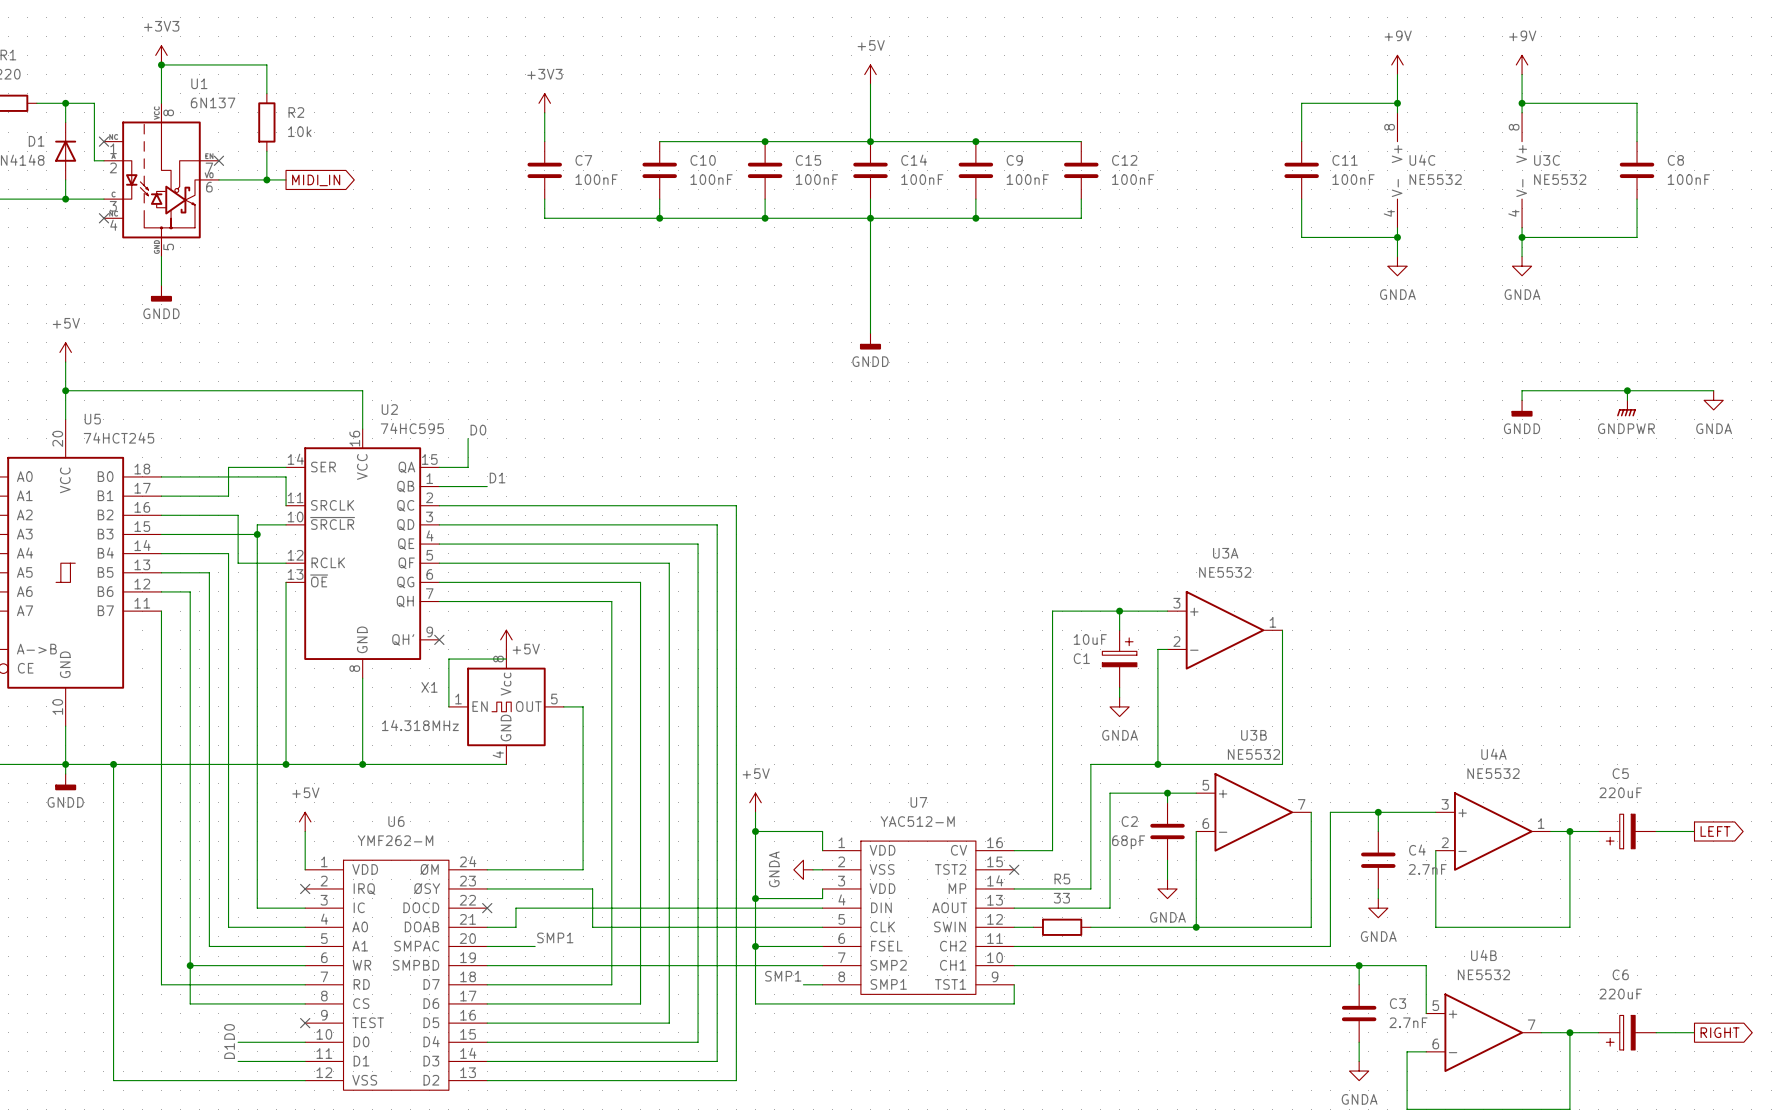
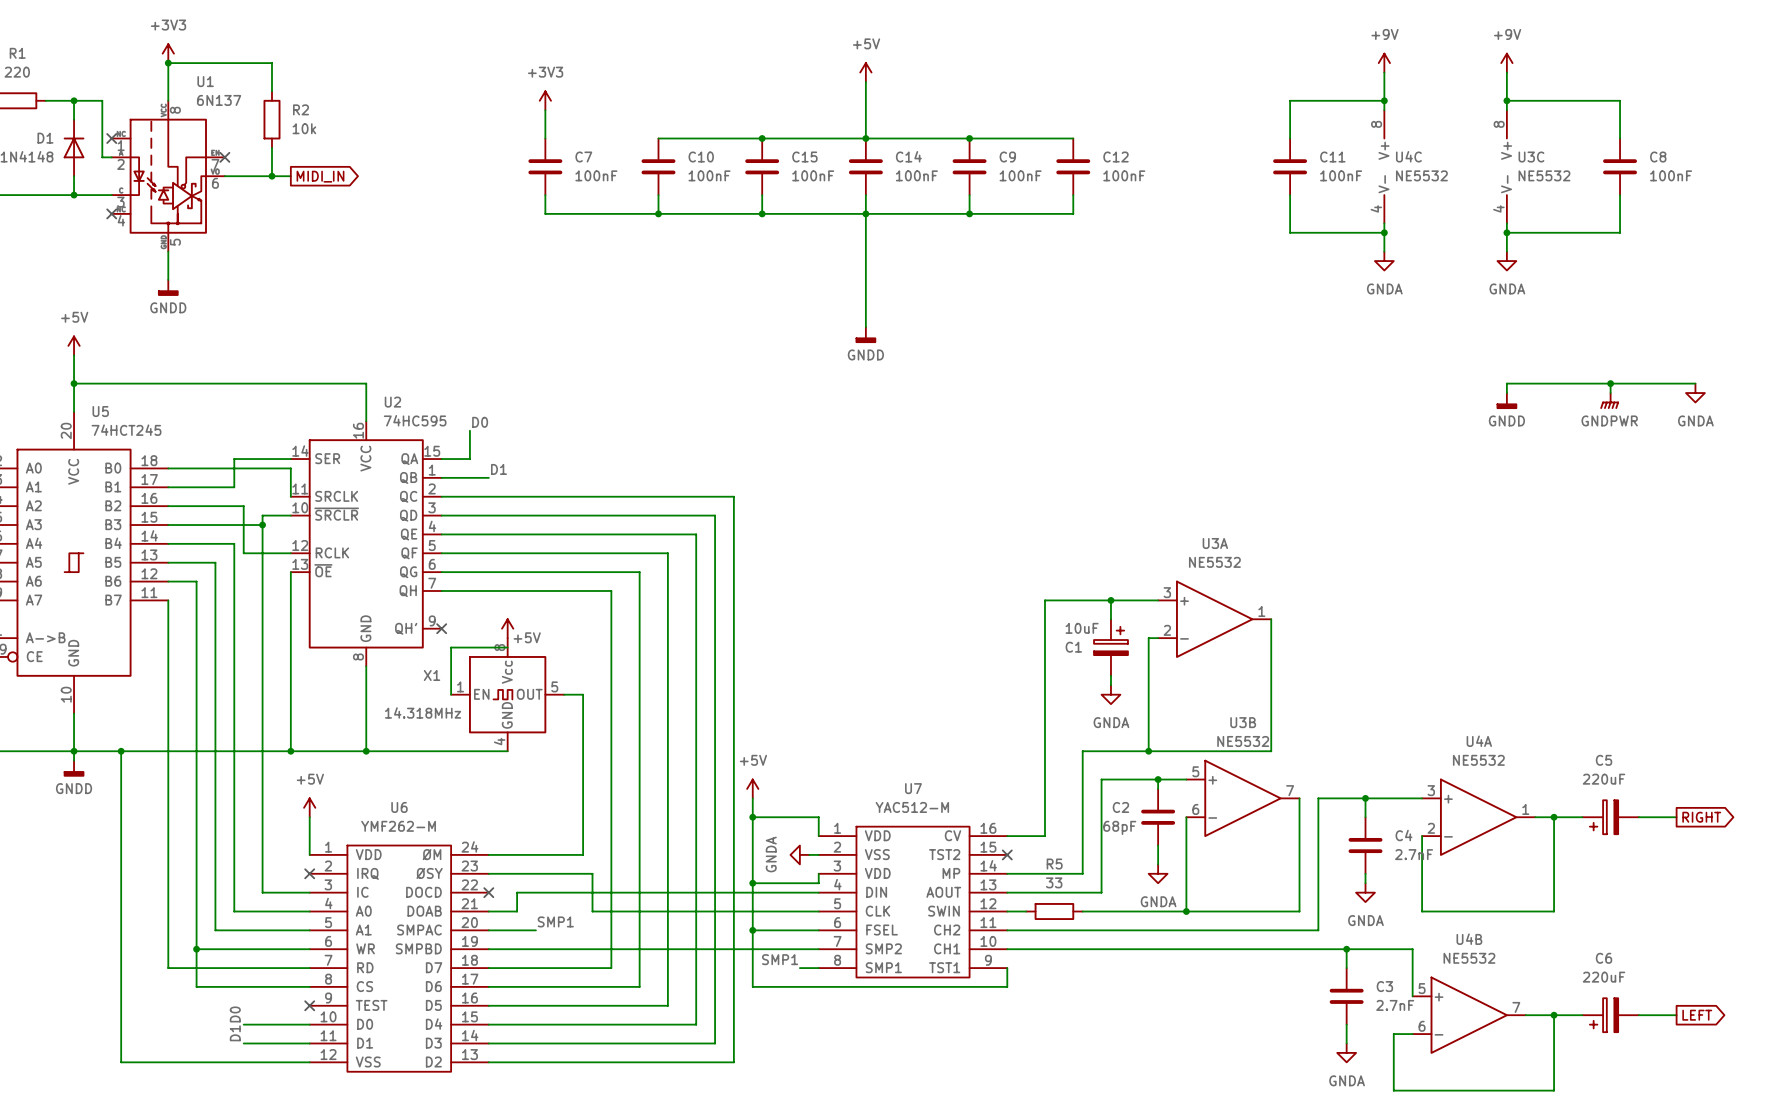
global label: LEFT (1715, 831) -> RIGHT (1701, 817)
global label: RIGHT (1720, 1032) -> LEFT (1697, 1015)

